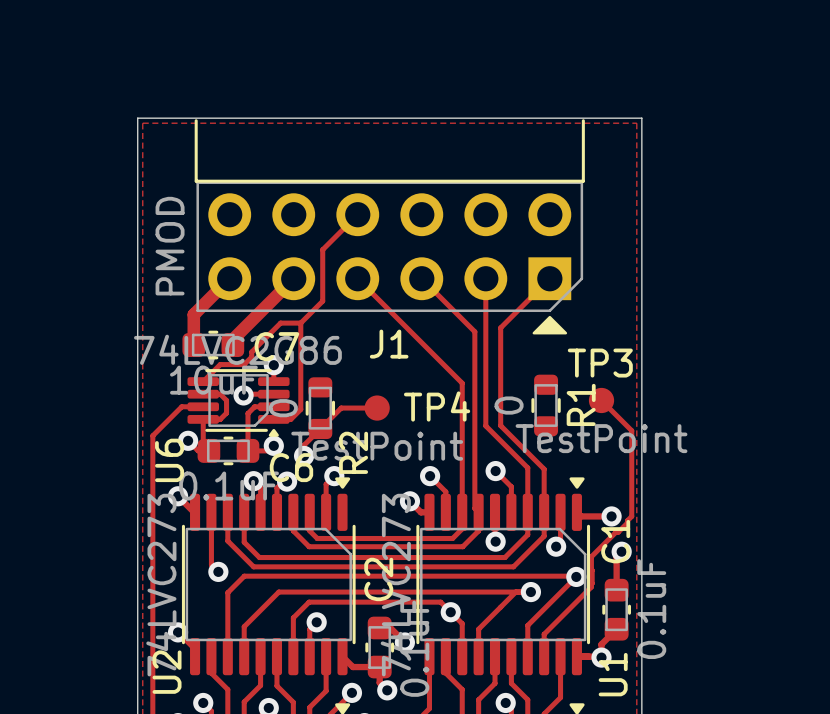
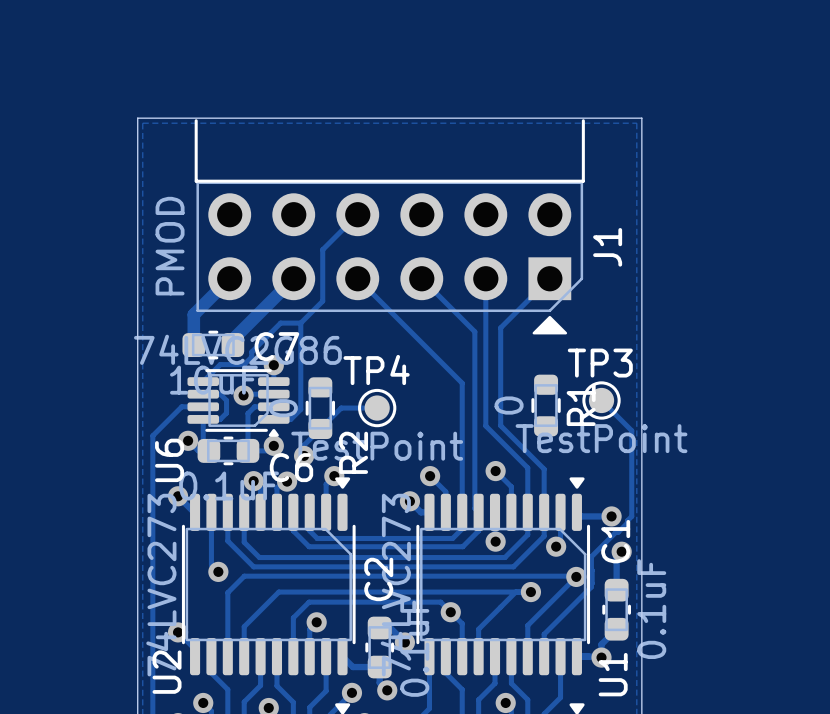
J1 name rotation: 0° (389, 344) -> 90° counterclockwise (607, 247)
J1 name position: J1 (389, 344) -> J1 (607, 247)
TP3 footprint: [588, 387, 615, 414] -> [582, 381, 621, 420]
TP4 footprint: [364, 395, 390, 421] -> [358, 388, 397, 428]
TP4 name position: TP4 (437, 406) -> TP4 (376, 370)

